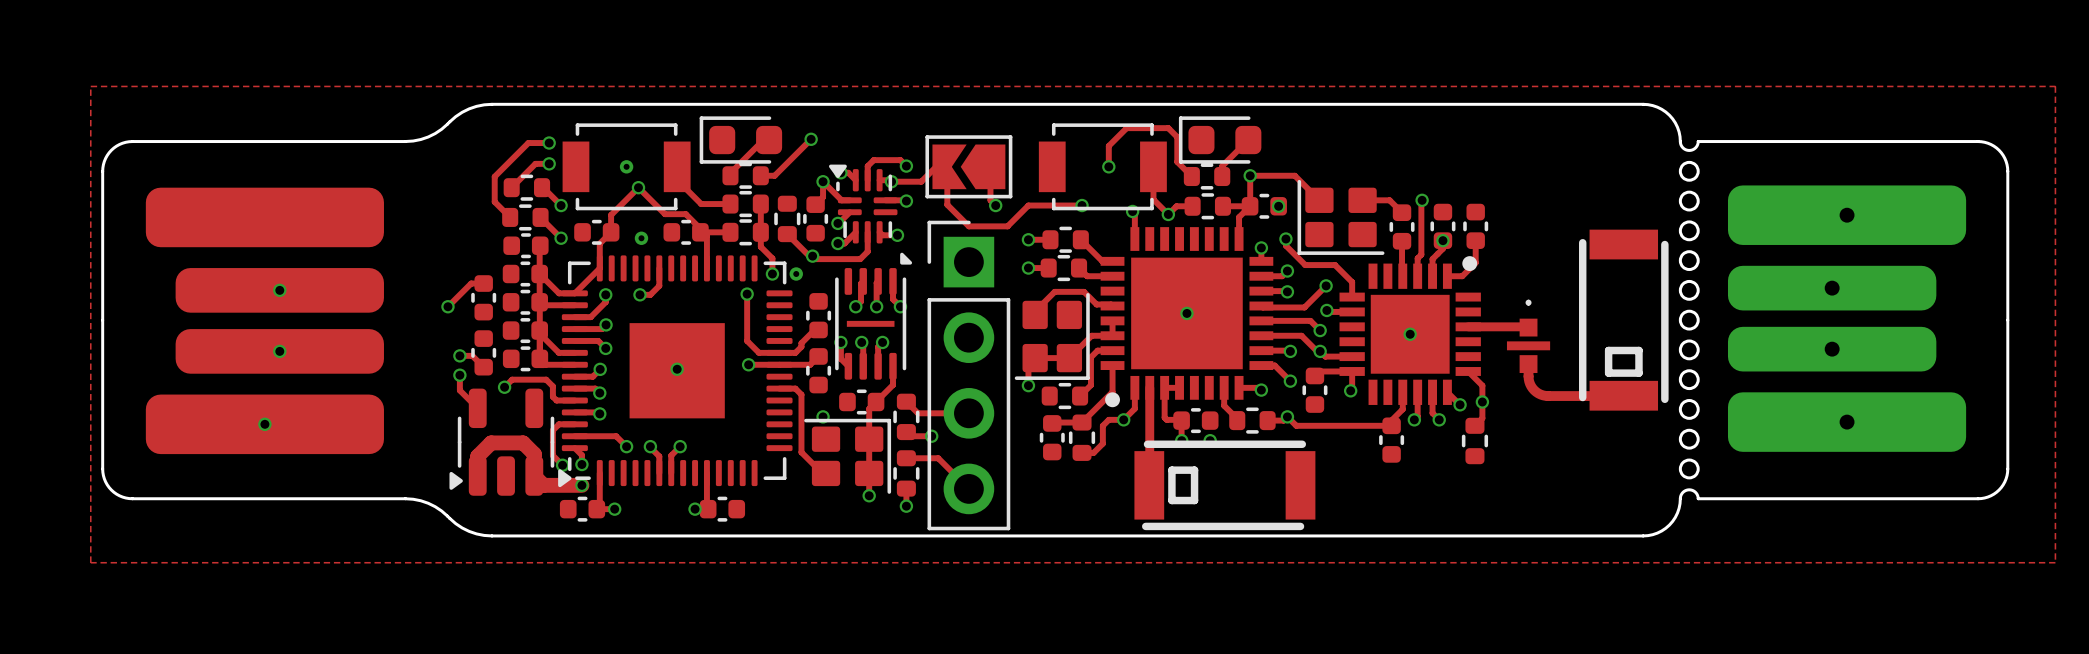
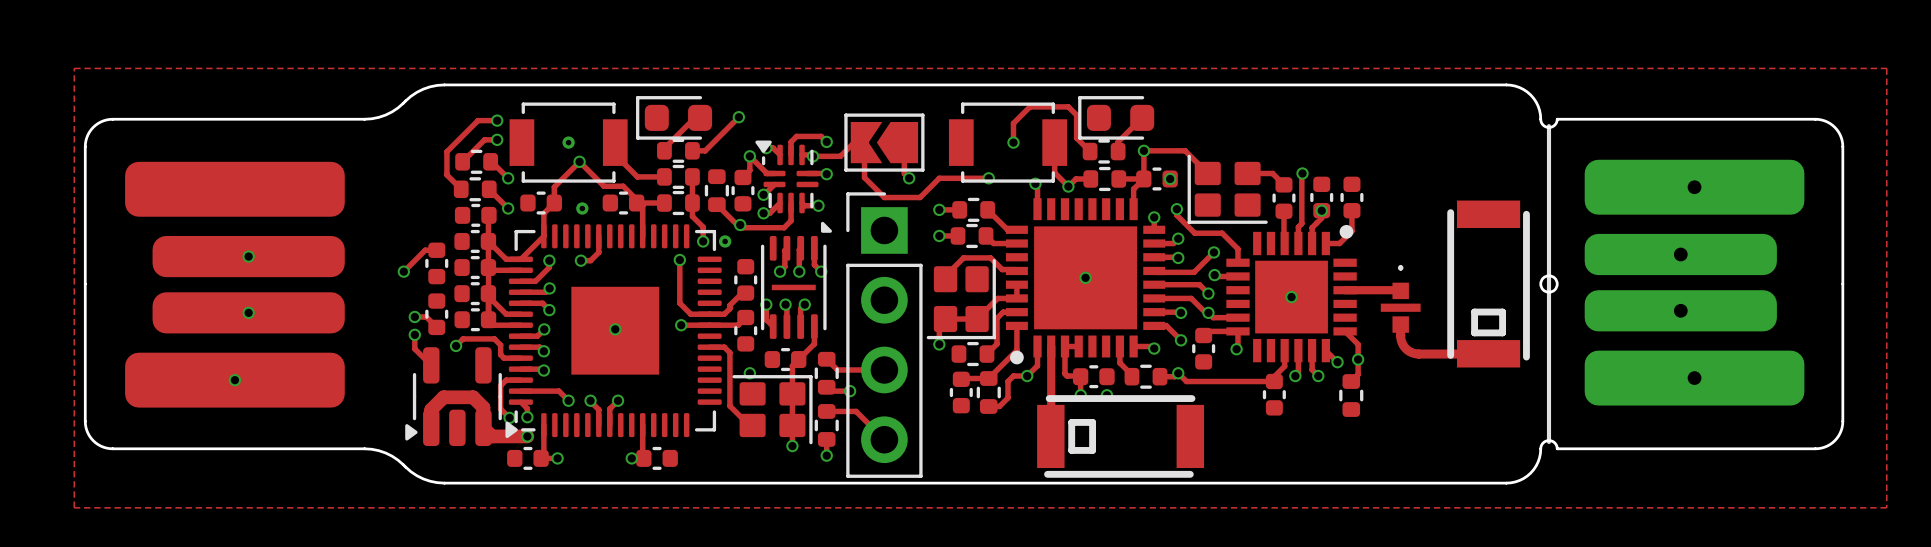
line: none -> (1548, 126) (1548, 441)
round board edge: [1678, 160, 1700, 182] -> none
round board edge: [1678, 190, 1700, 212] -> none
round board edge: [1678, 220, 1700, 242] -> none
round board edge: [1678, 250, 1700, 272] -> none
round board edge: [1678, 279, 1700, 301] -> none
round board edge: [1678, 339, 1700, 361] -> none
round board edge: [1678, 369, 1700, 391] -> none
round board edge: [1678, 399, 1700, 420] -> none
round board edge: [1678, 428, 1700, 450] -> none
round board edge: [1678, 458, 1700, 480] -> none

